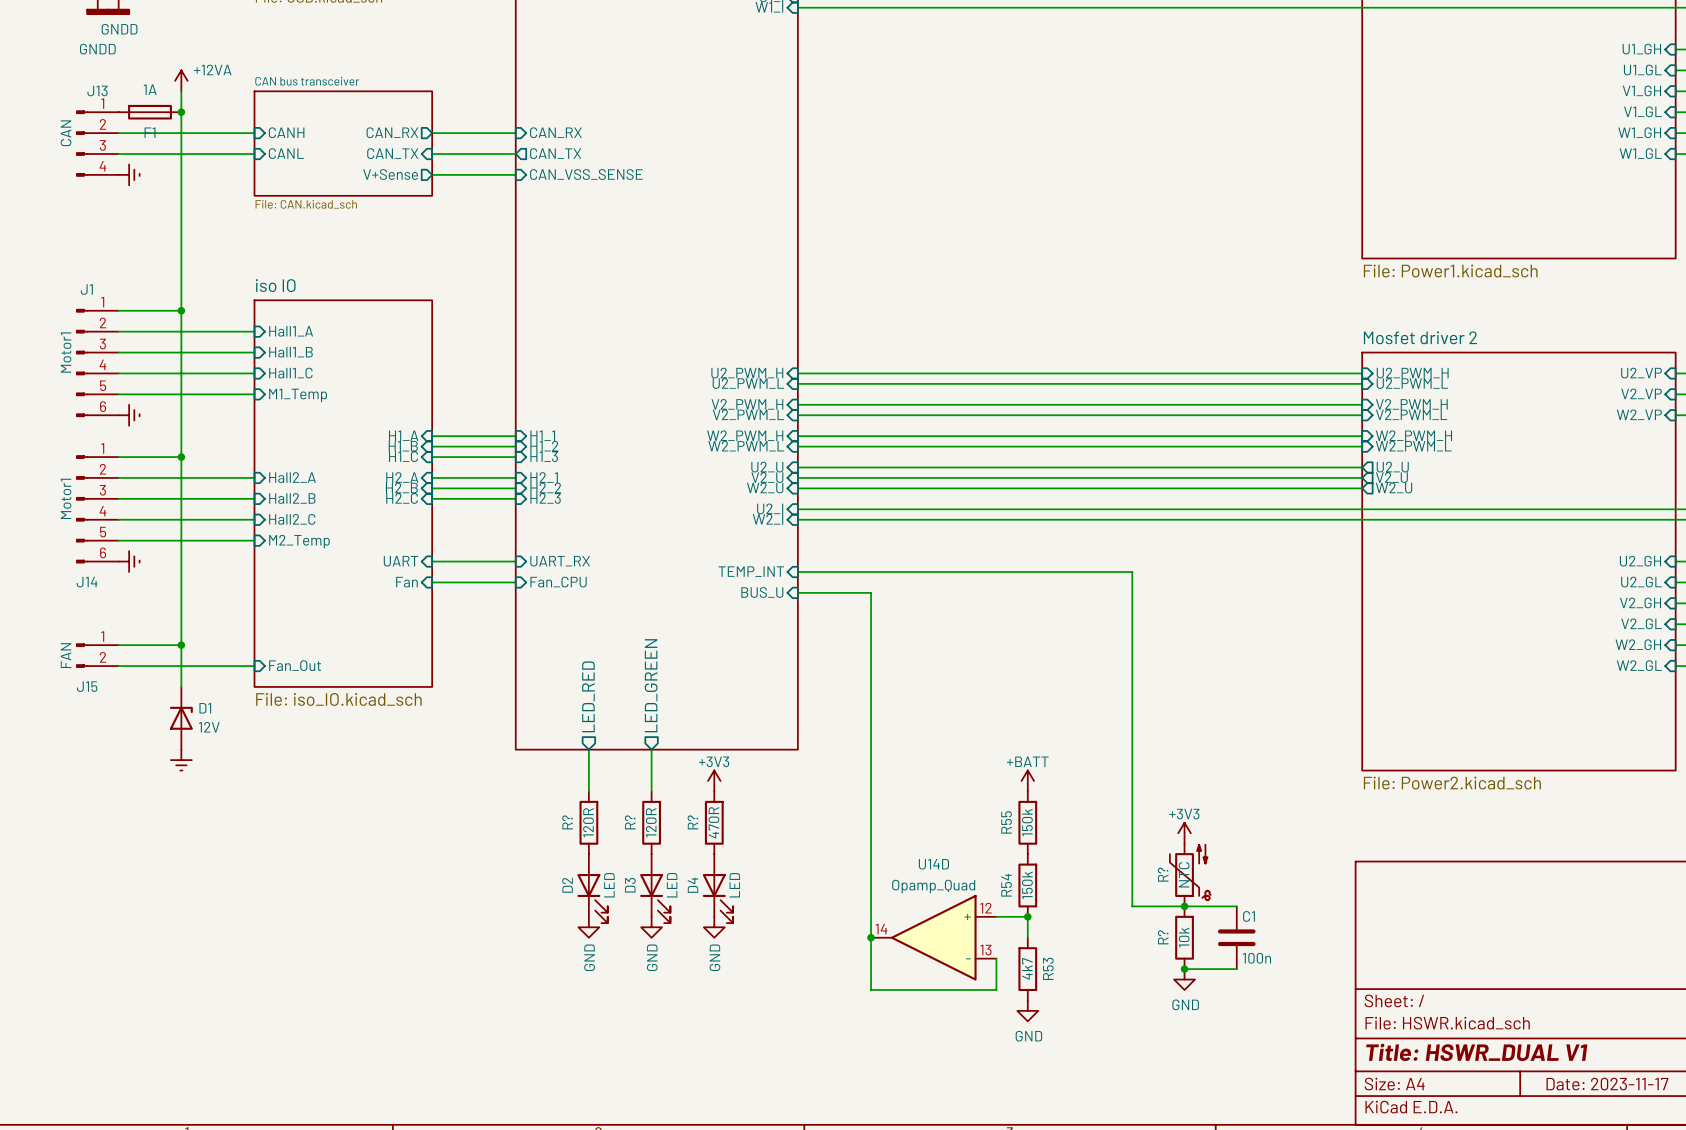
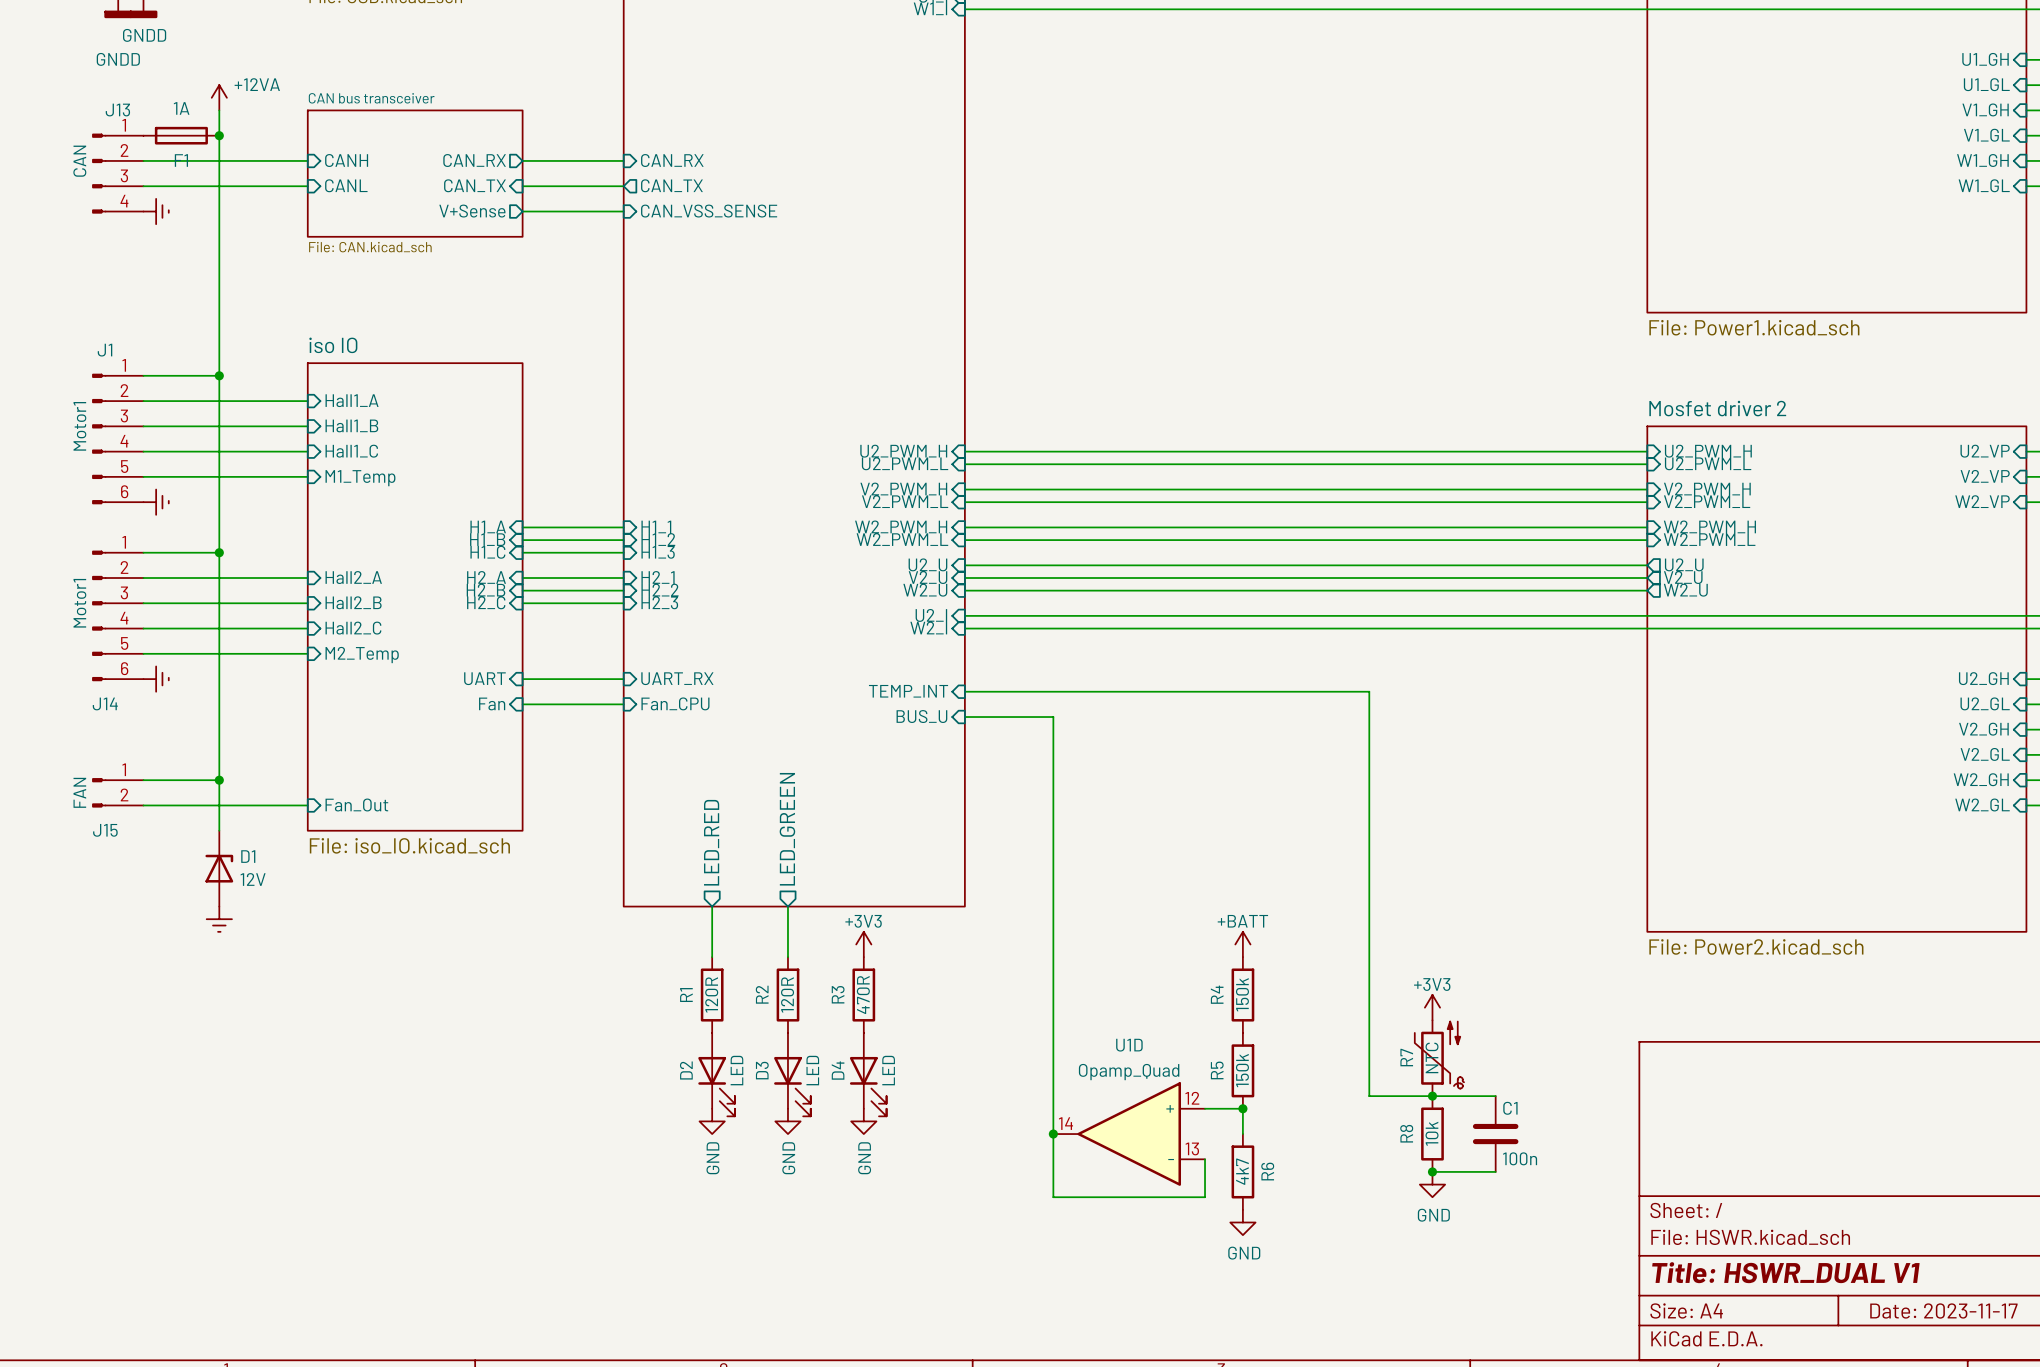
R? name: R? (567, 822) -> R1 (686, 995)
R? name: R? (630, 822) -> R2 (762, 994)
R? name: R? (692, 822) -> R3 (838, 994)
R55 name: R55 (1006, 822) -> R4 (1217, 994)
U14D name: U14D (933, 864) -> U1D (1129, 1045)
R? name: R? (1163, 874) -> R7 (1406, 1057)
R54 name: R54 (1006, 885) -> R5 (1217, 1070)
R? name: R? (1163, 937) -> R8 (1406, 1133)
R53 name: R53 (1048, 968) -> R6 (1267, 1171)

